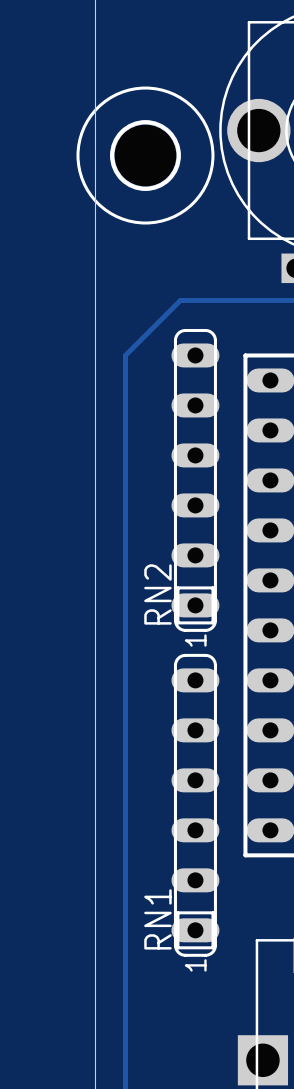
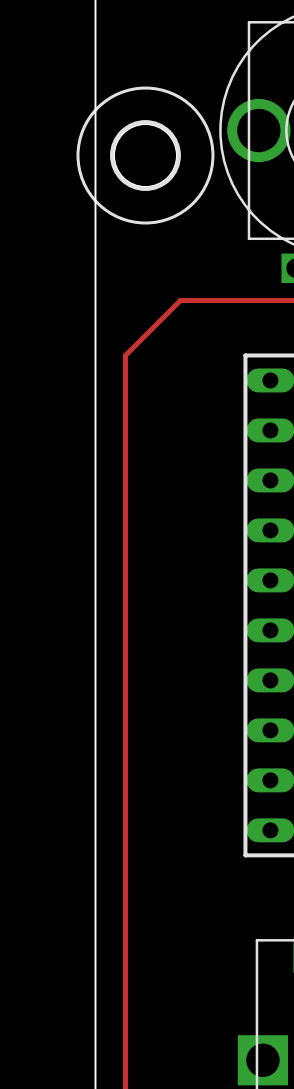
RN2: (195, 480) -> none
RN1: (195, 805) -> none

